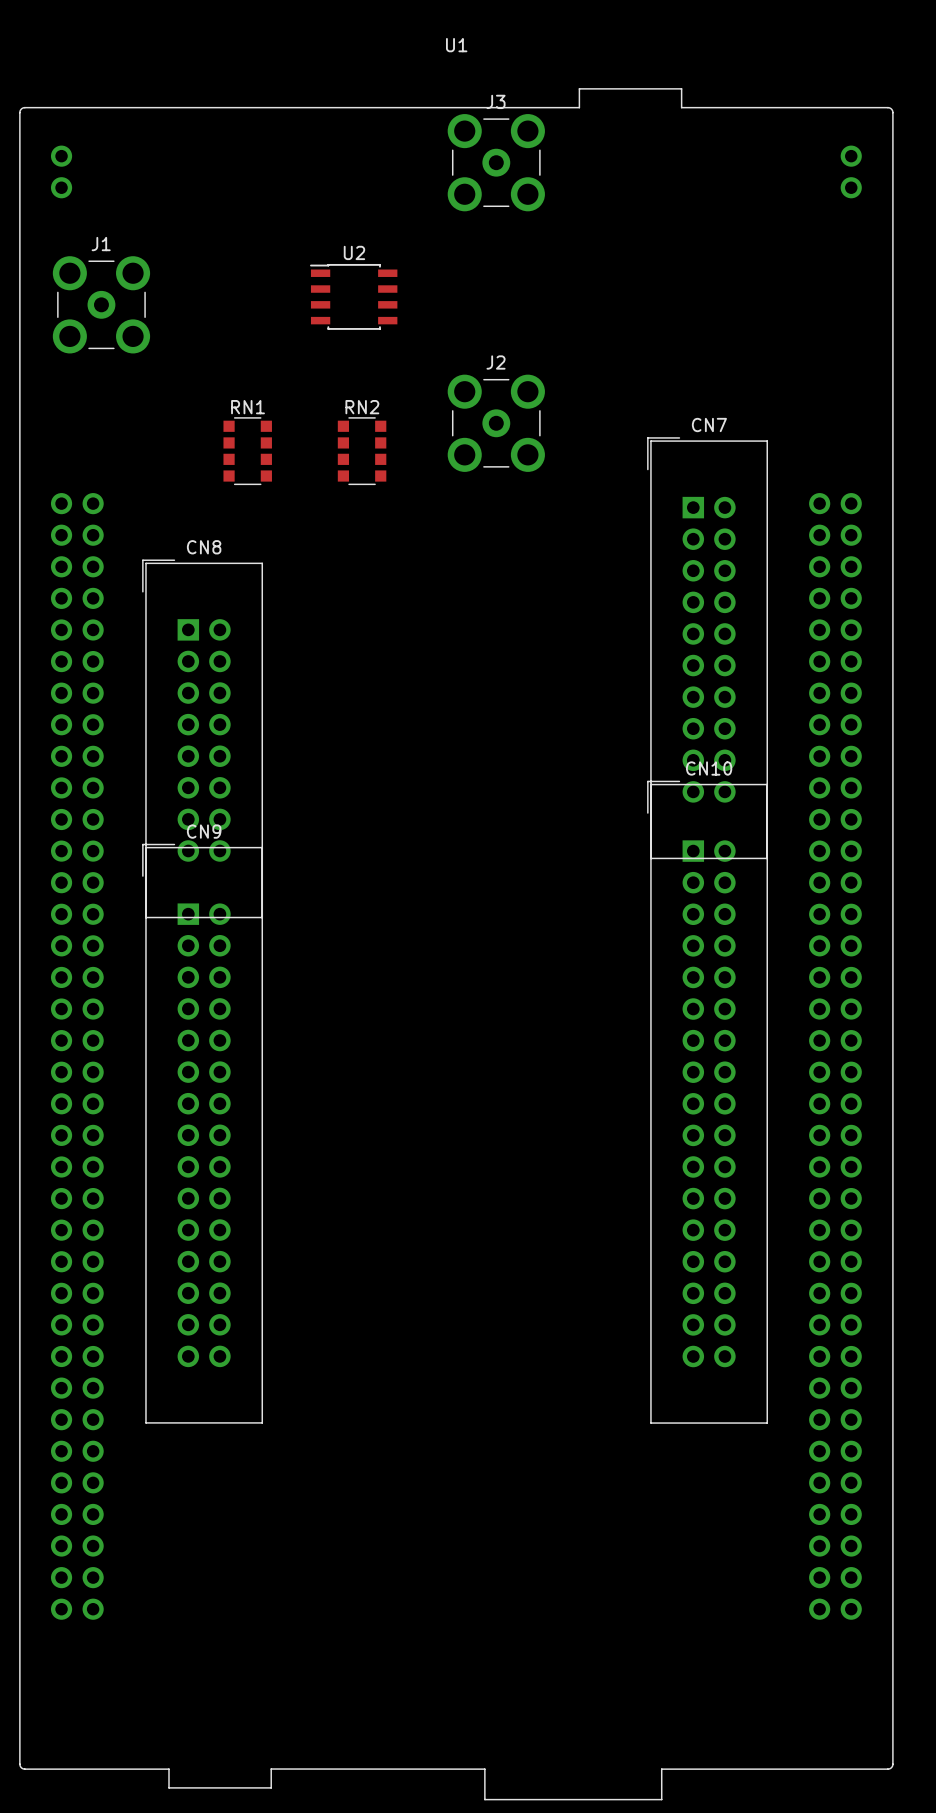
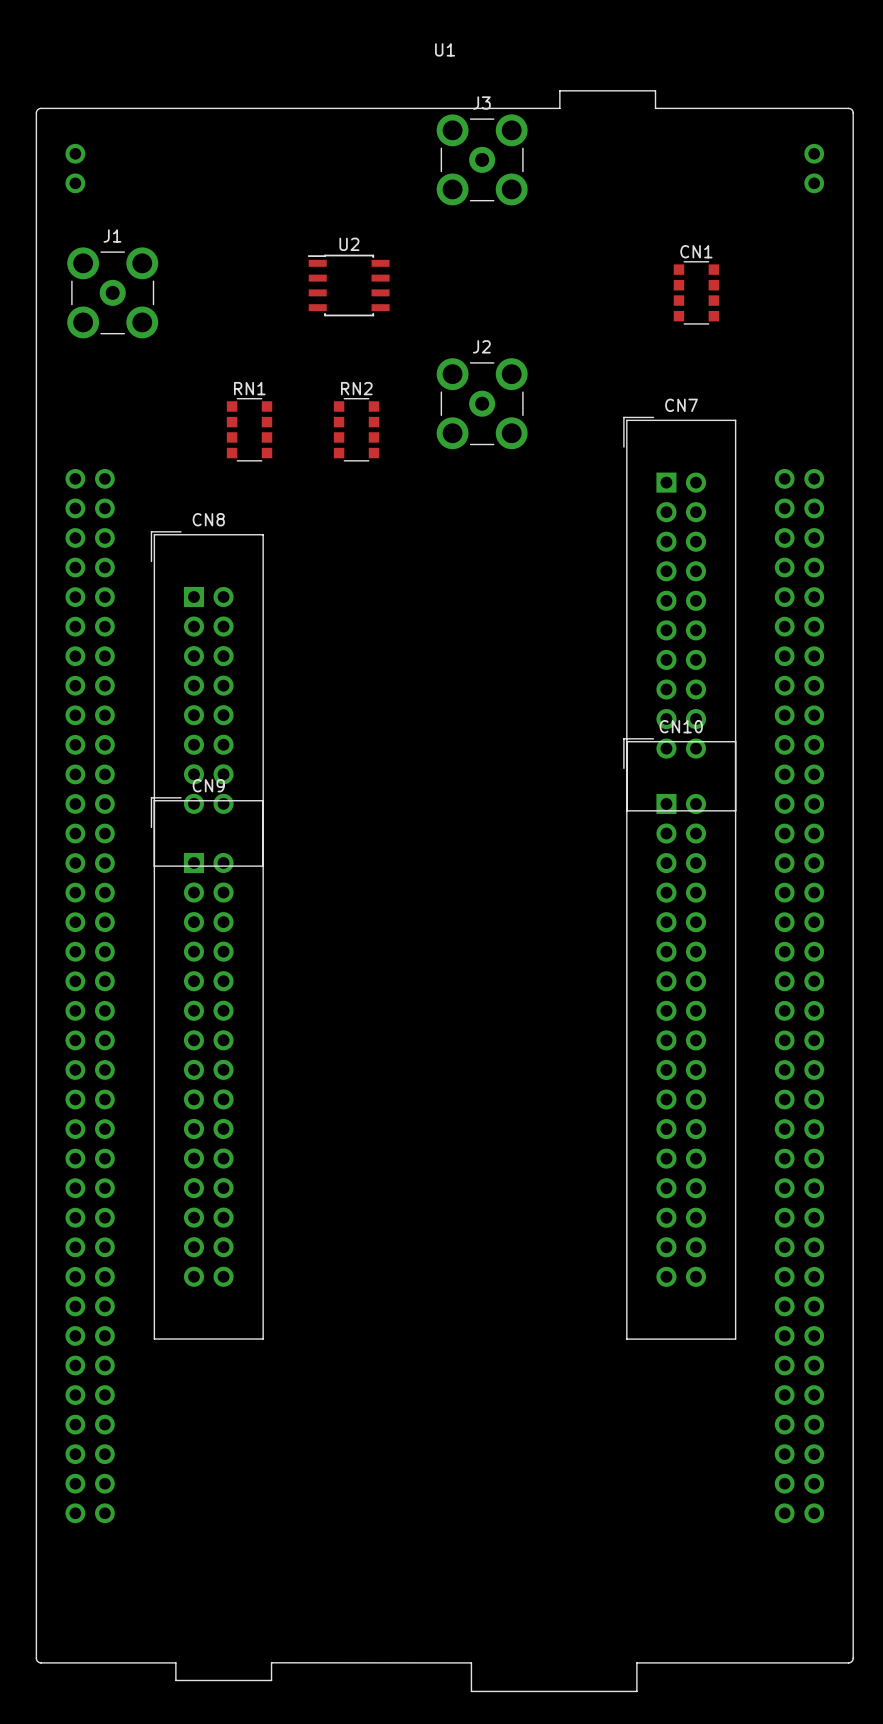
CN1: none -> (696, 292)

